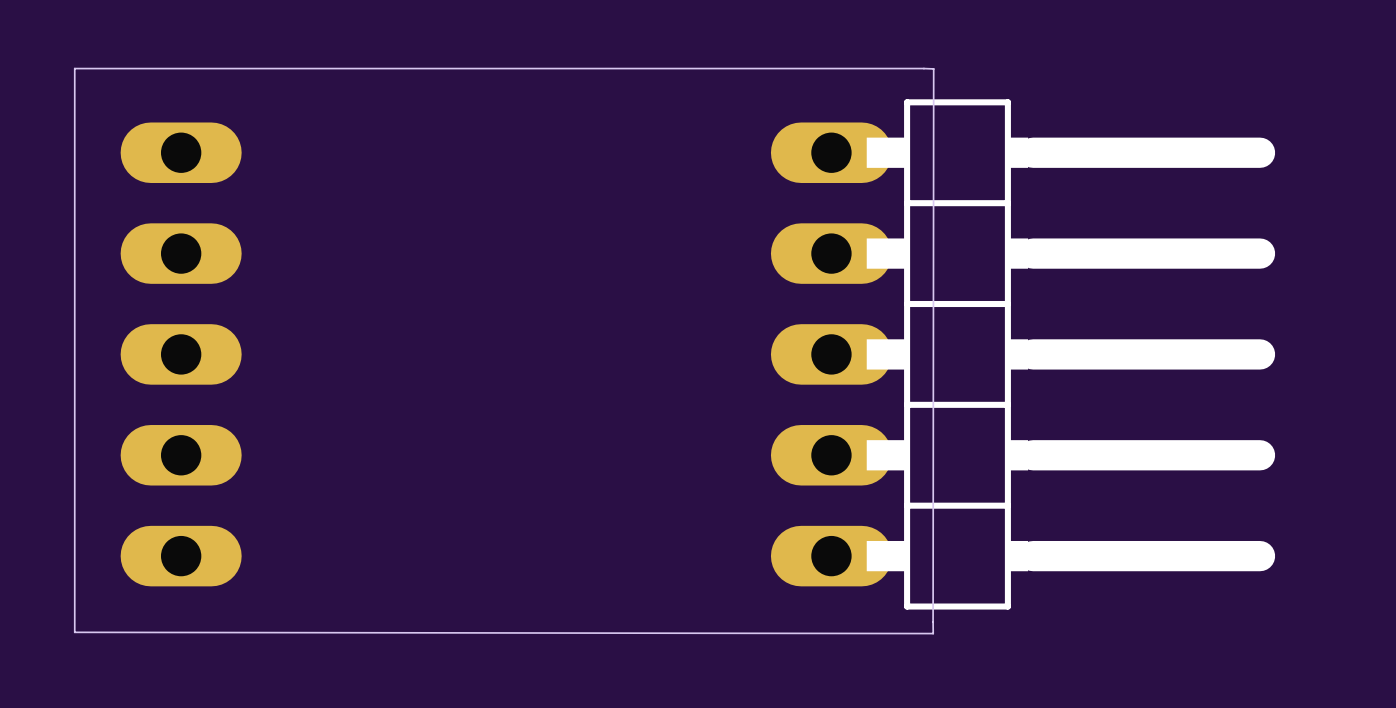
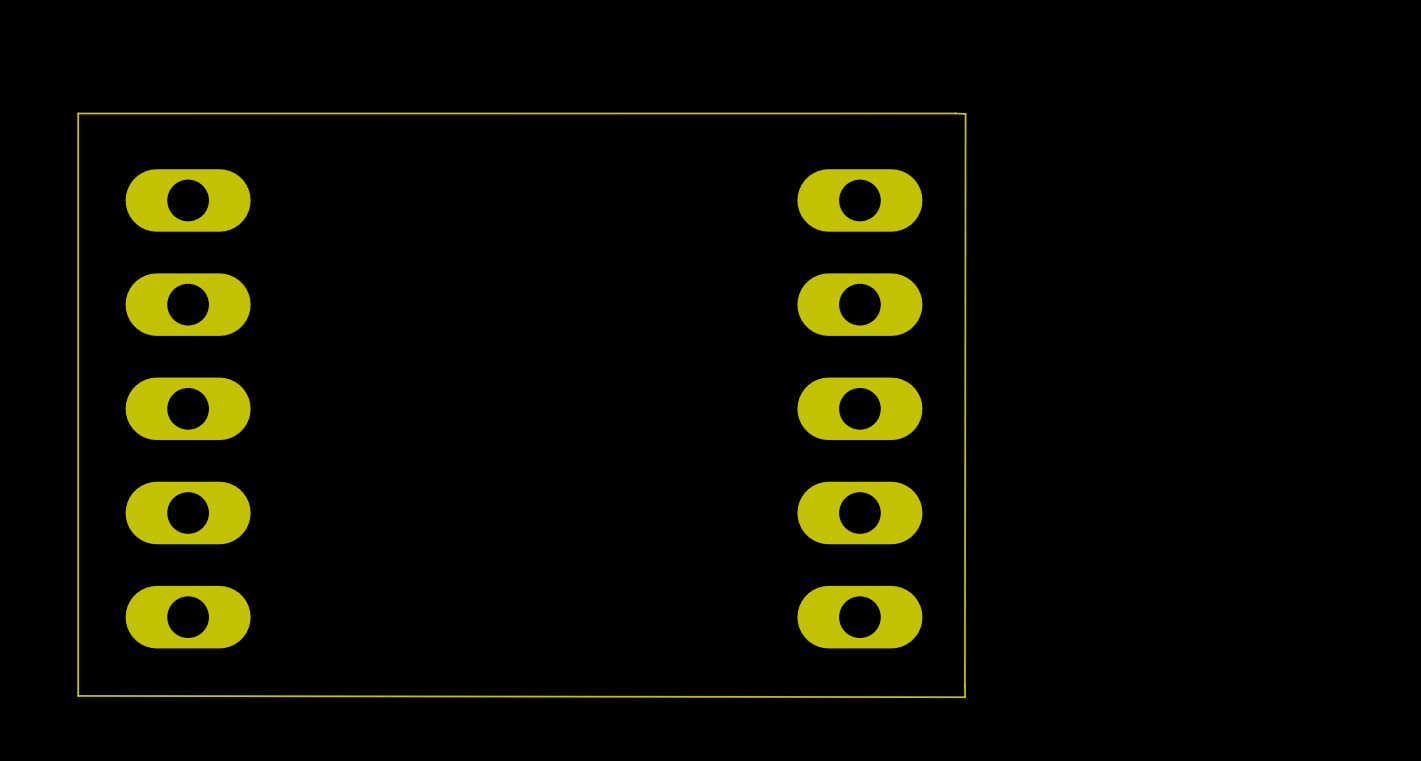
part side: bottom (1023, 354) -> top (859, 408)

